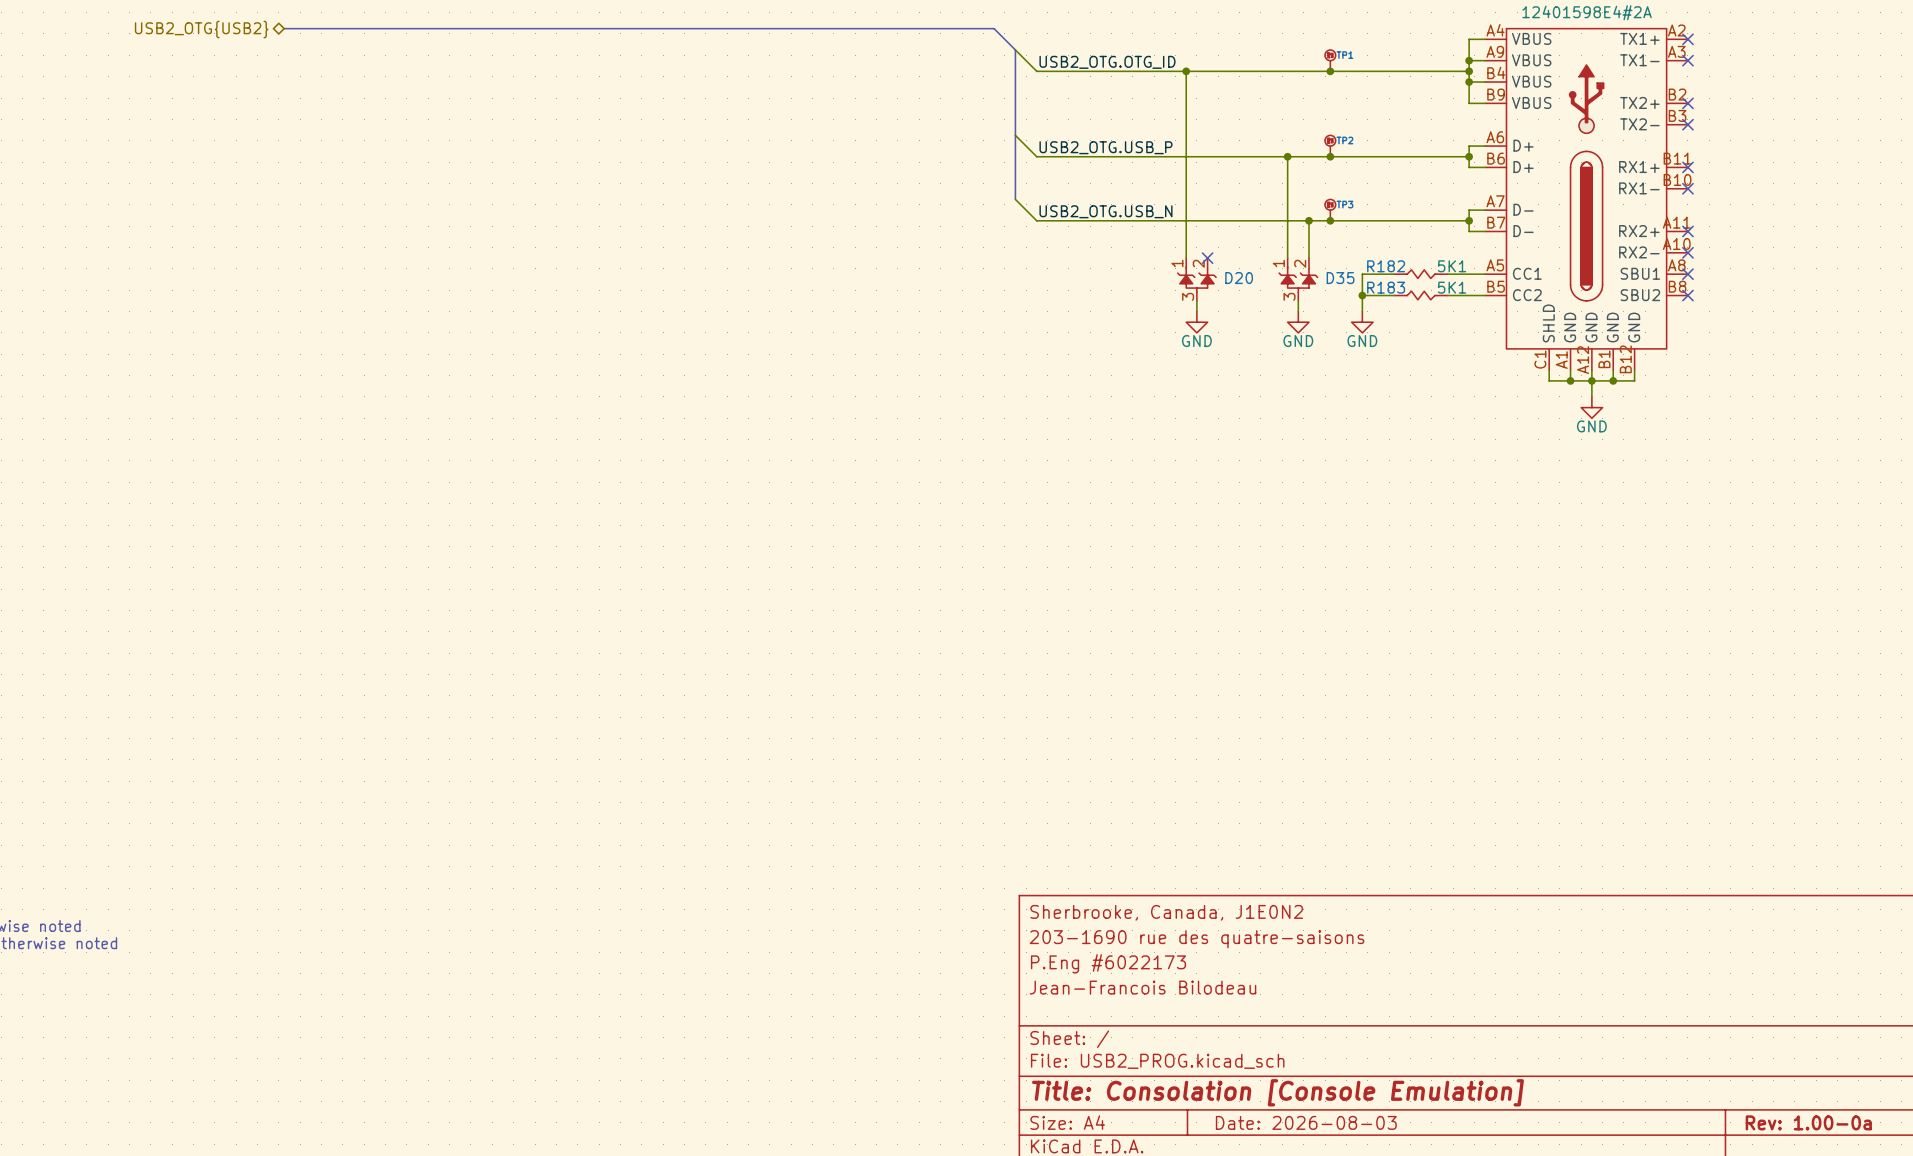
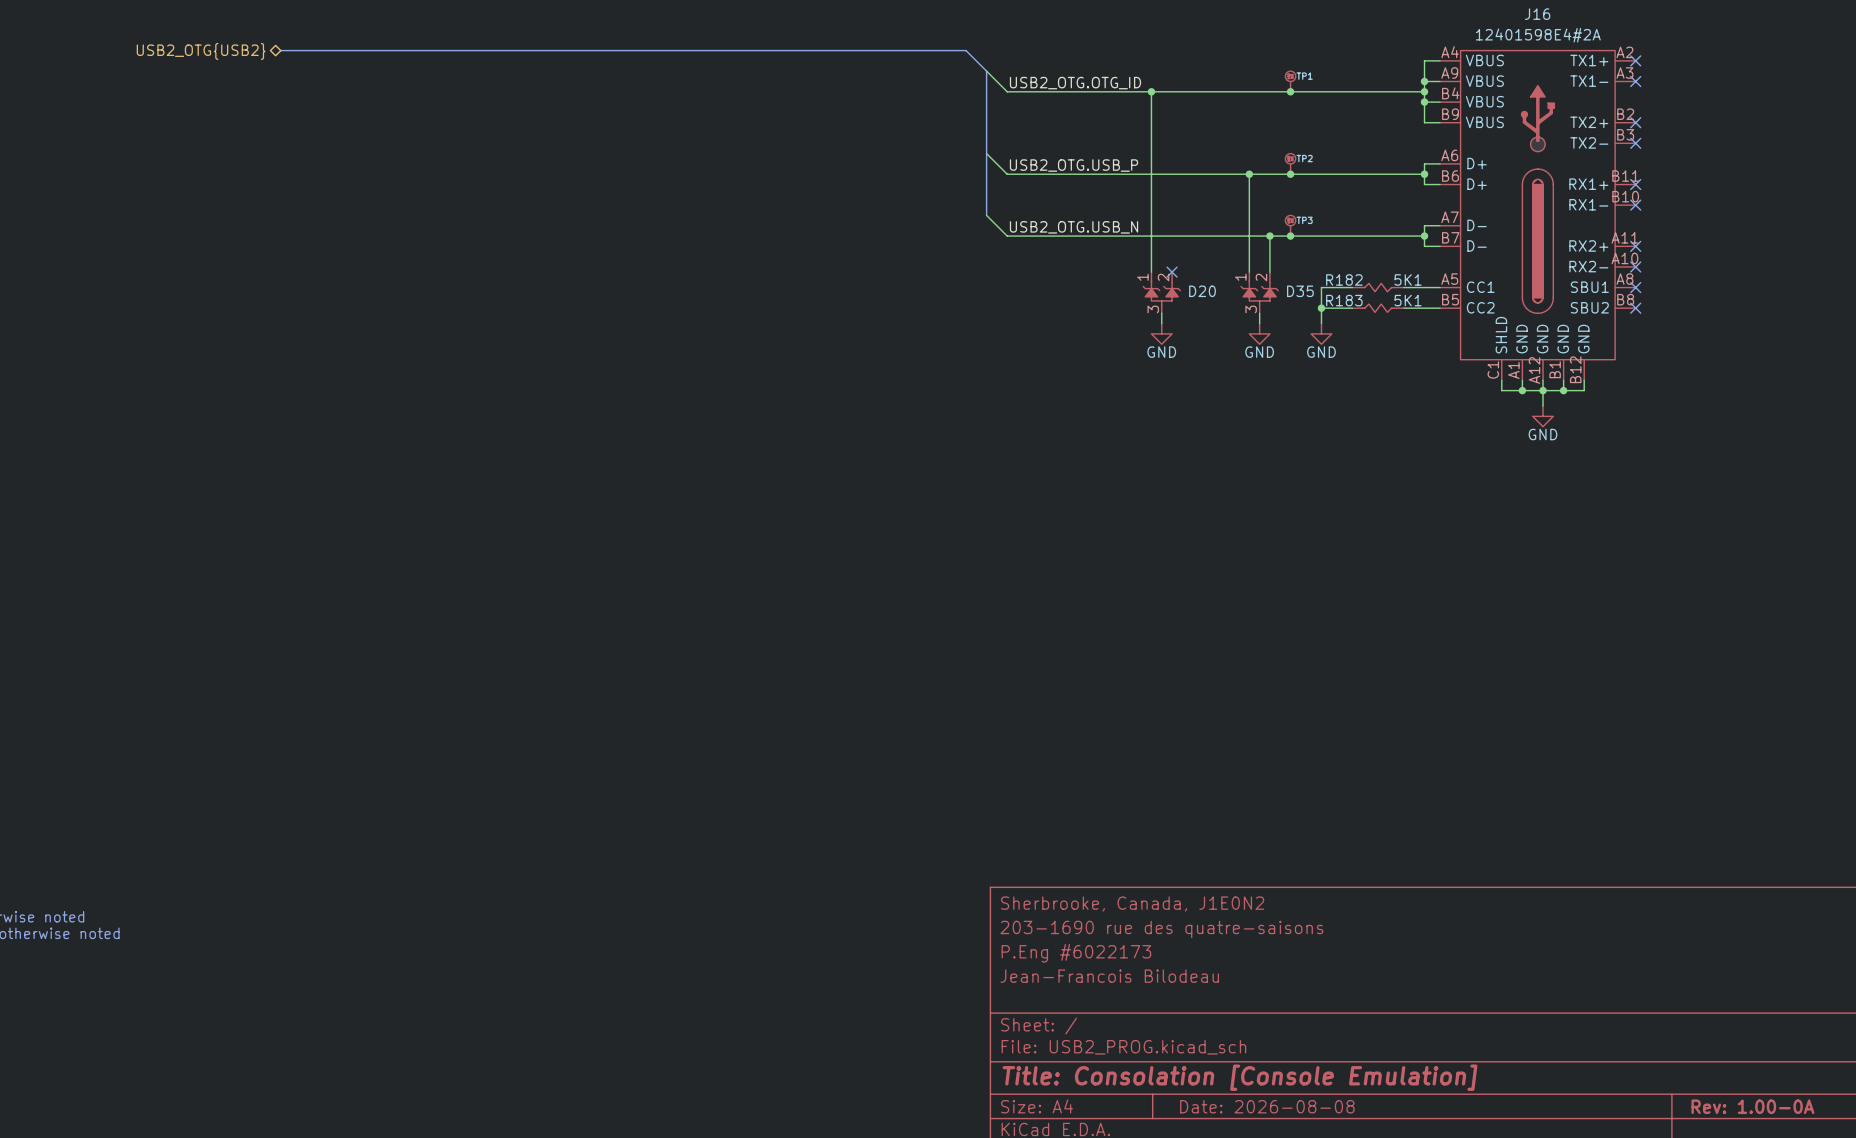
title block: Date: 2026-08-03 (1306, 1122) -> Date: 2026-08-08 (1267, 1106)
title block: Rev: 1.00-0a (1808, 1122) -> Rev: 1.00-0A (1752, 1106)

